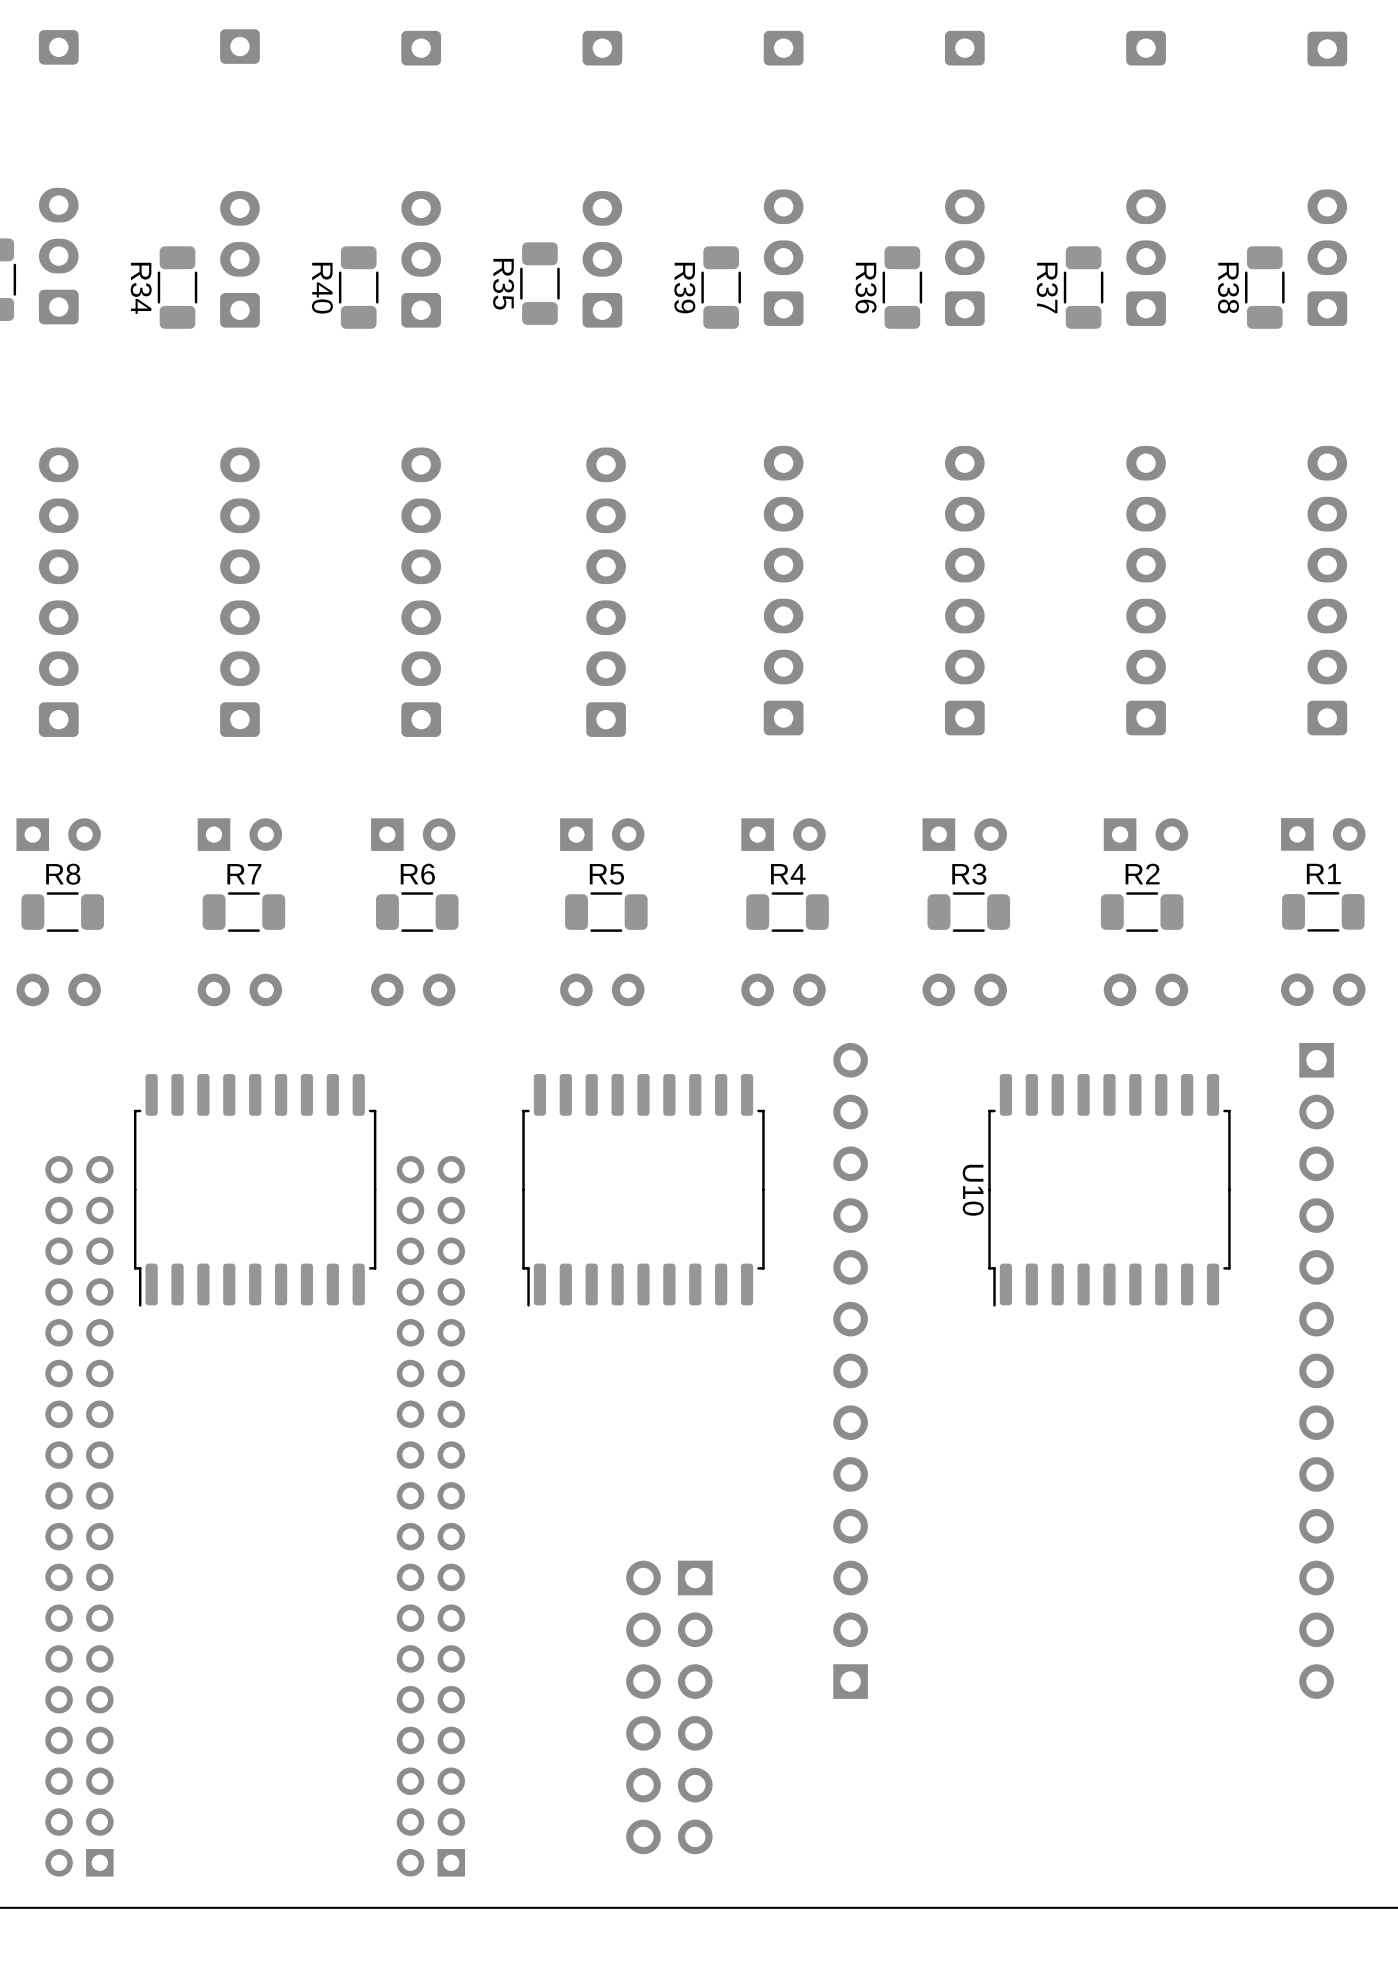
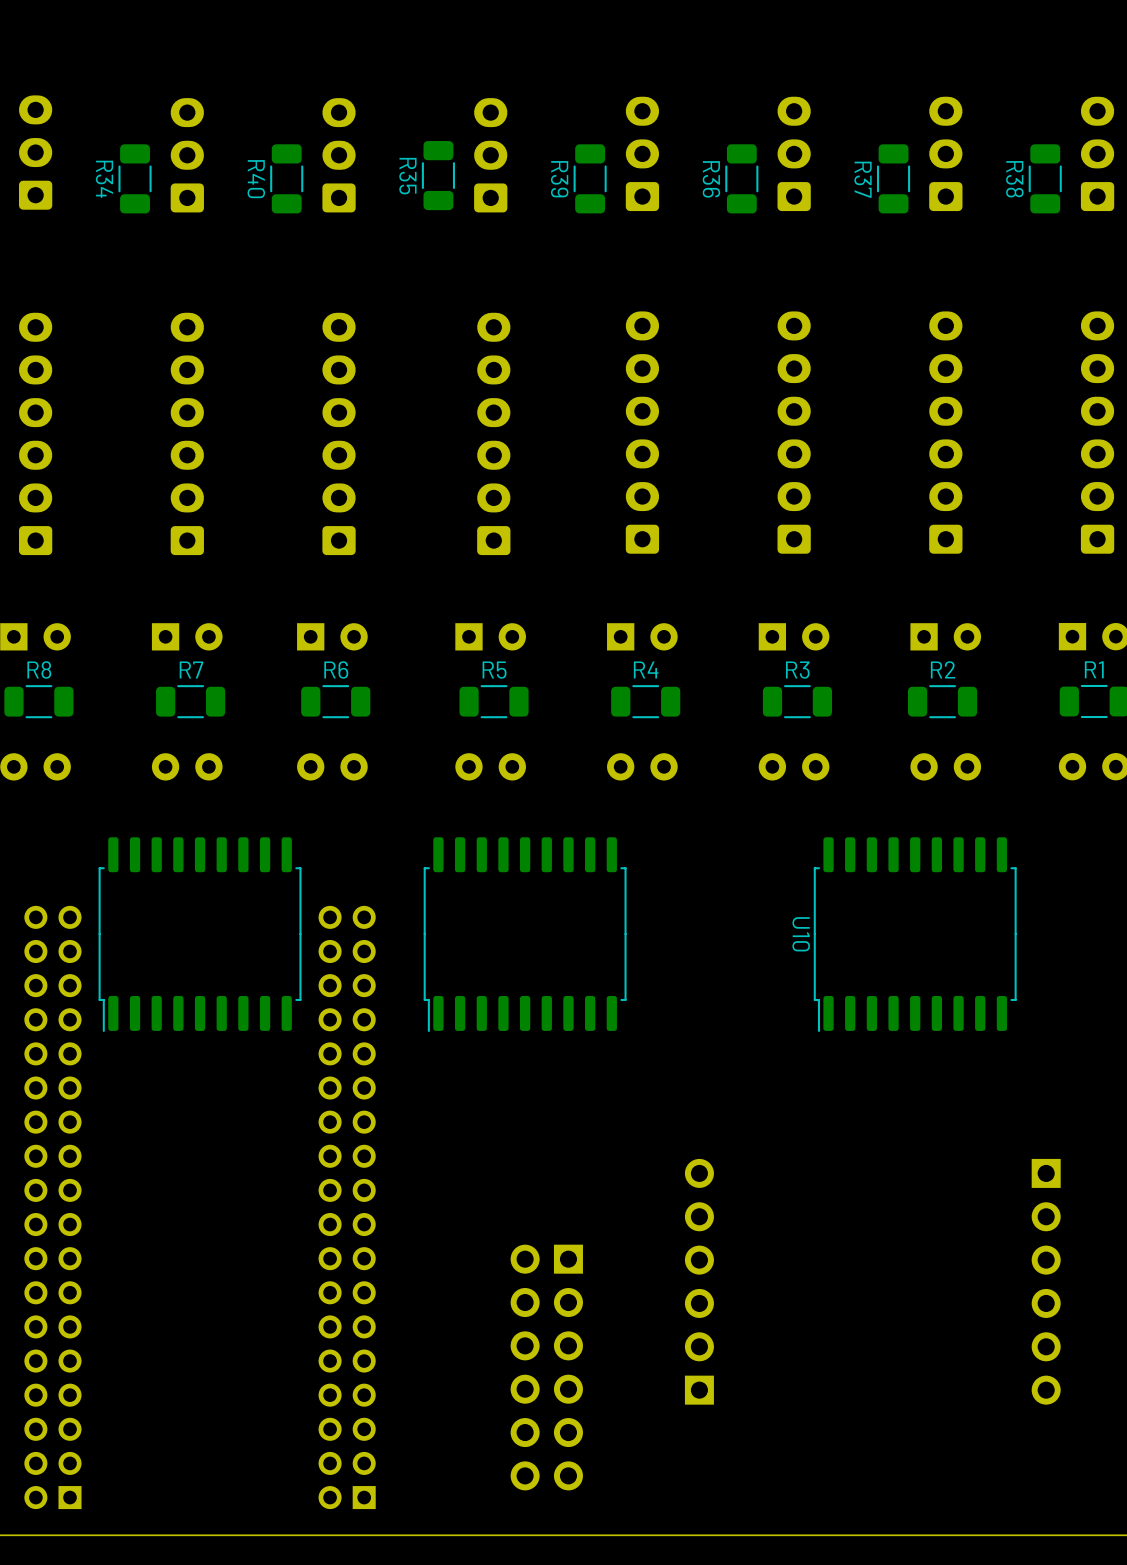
part: (850, 1370) -> none
part: (1316, 1370) -> none
part: none -> (699, 1281)
part: none -> (1046, 1281)

